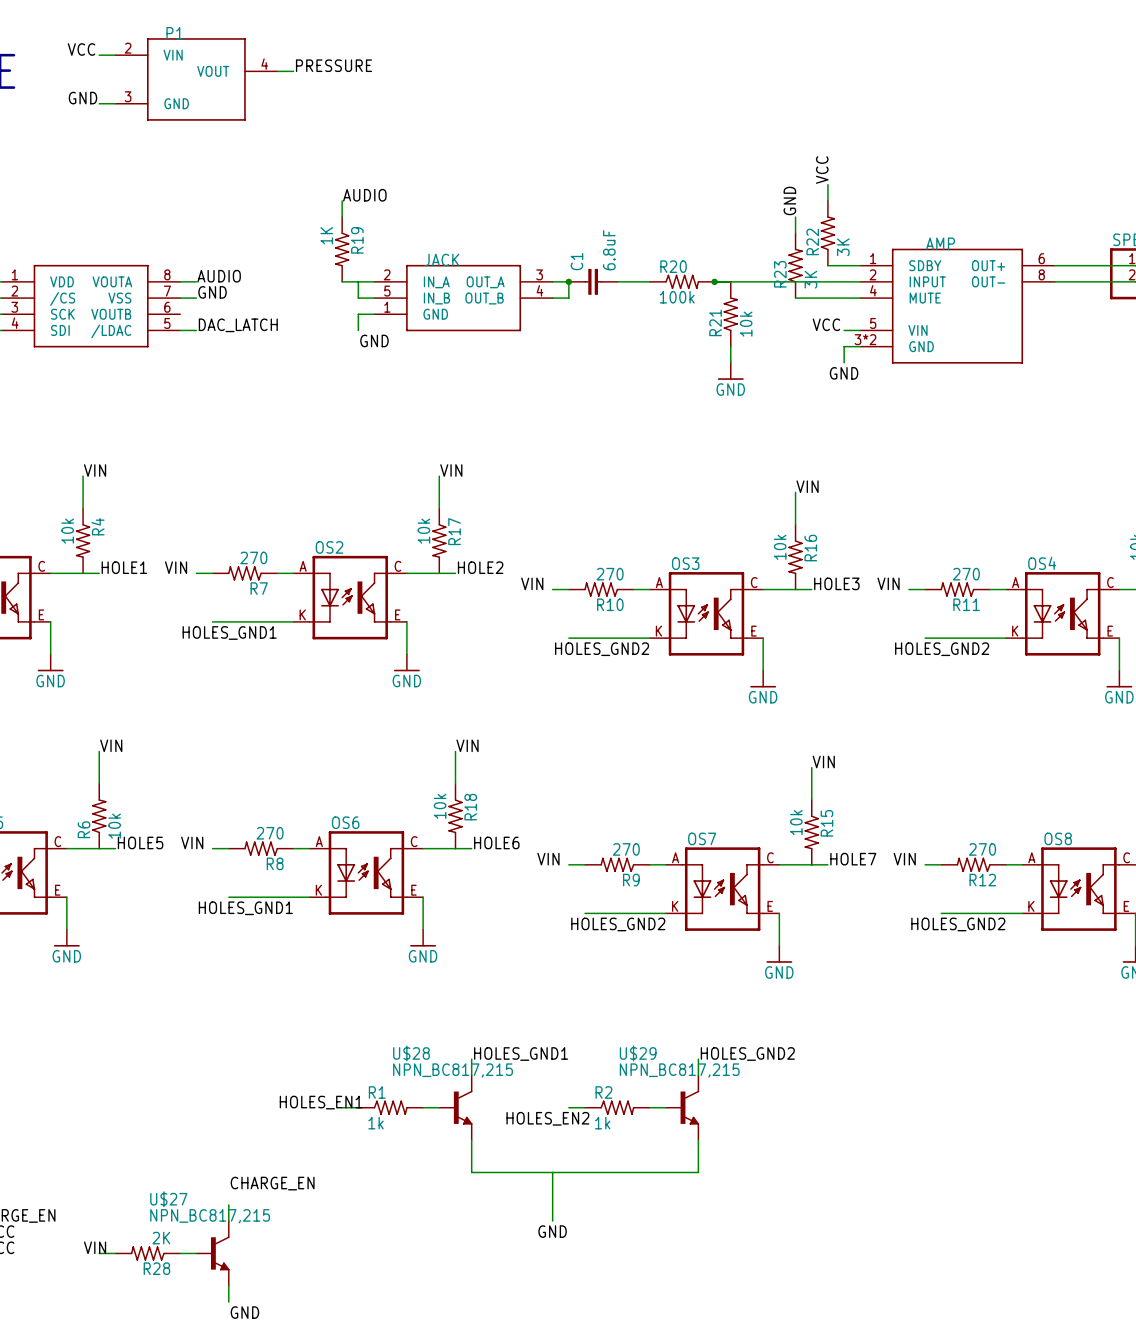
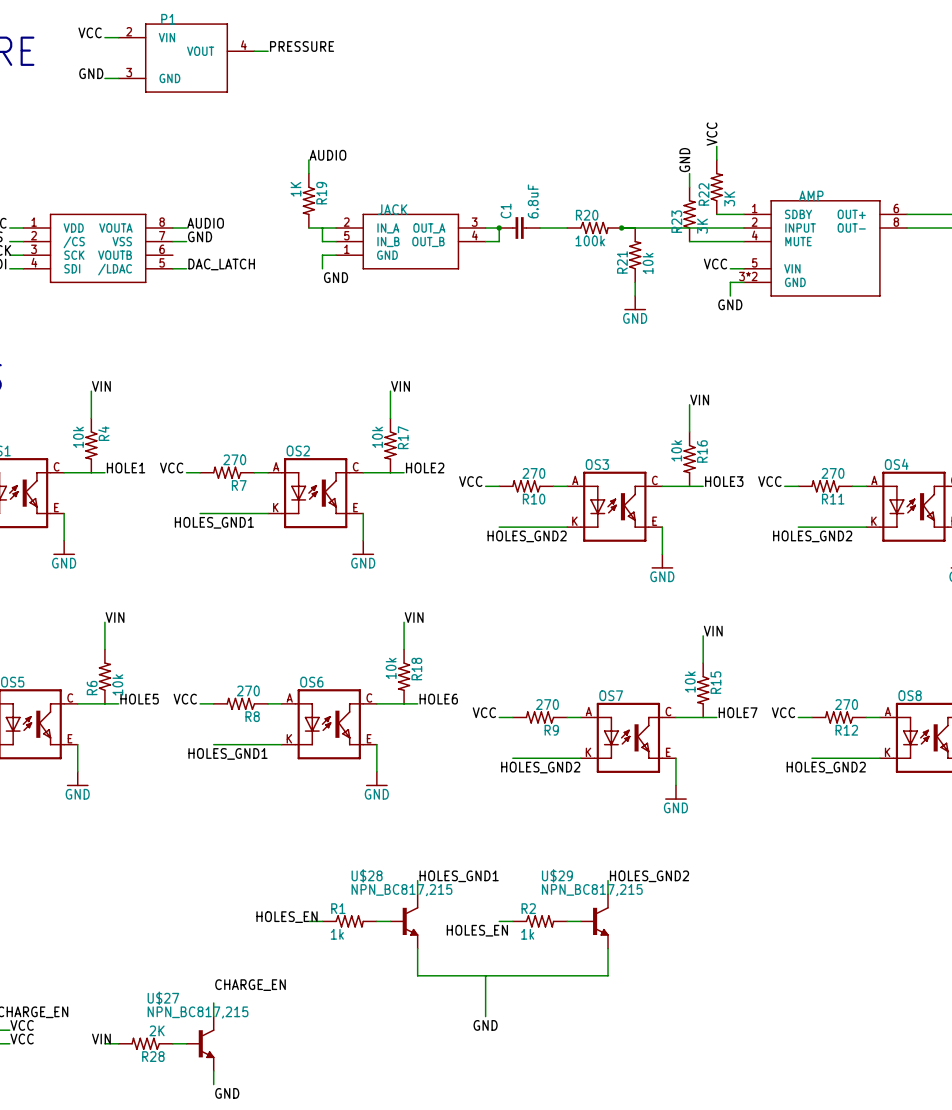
label: VIN (176, 567) -> VCC (171, 467)
label: VIN (532, 583) -> VCC (470, 481)
label: VIN (888, 583) -> VCC (769, 481)
label: VIN (192, 842) -> VCC (185, 699)
label: VIN (548, 859) -> VCC (484, 712)
label: VIN (904, 859) -> VCC (783, 712)
label: HOLES_EN1 (321, 1102) -> HOLES_EN (287, 917)
label: HOLES_EN2 (547, 1118) -> HOLES_EN (477, 930)

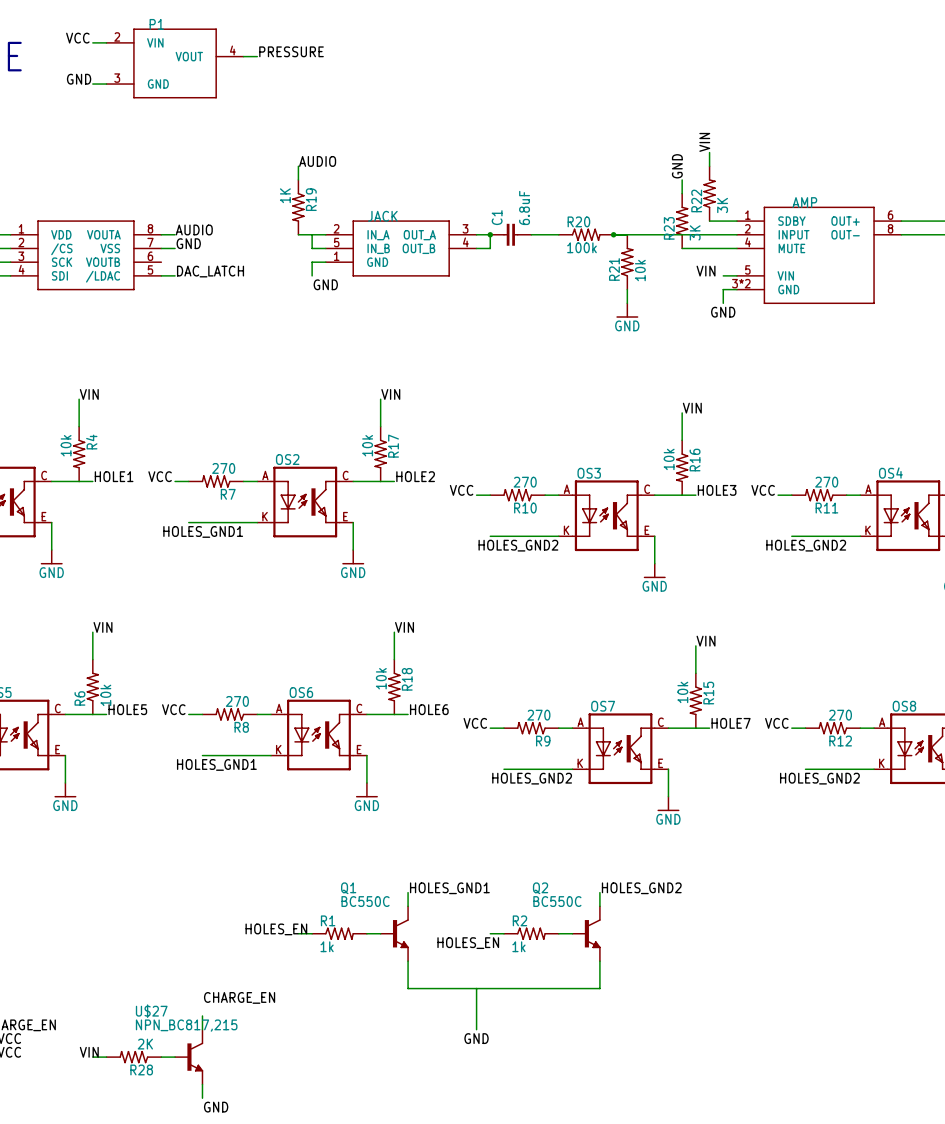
label: VCC (712, 134) -> VIN (704, 142)
label: VCC (715, 264) -> VIN (706, 271)
U$28 name: U$28 (367, 875) -> Q1 (348, 888)
U$29 name: U$29 (557, 875) -> Q2 (540, 888)
U$28 value: NPN_BC817,215 (401, 890) -> BC550C (365, 901)
U$29 value: NPN_BC817,215 (592, 890) -> BC550C (557, 901)

